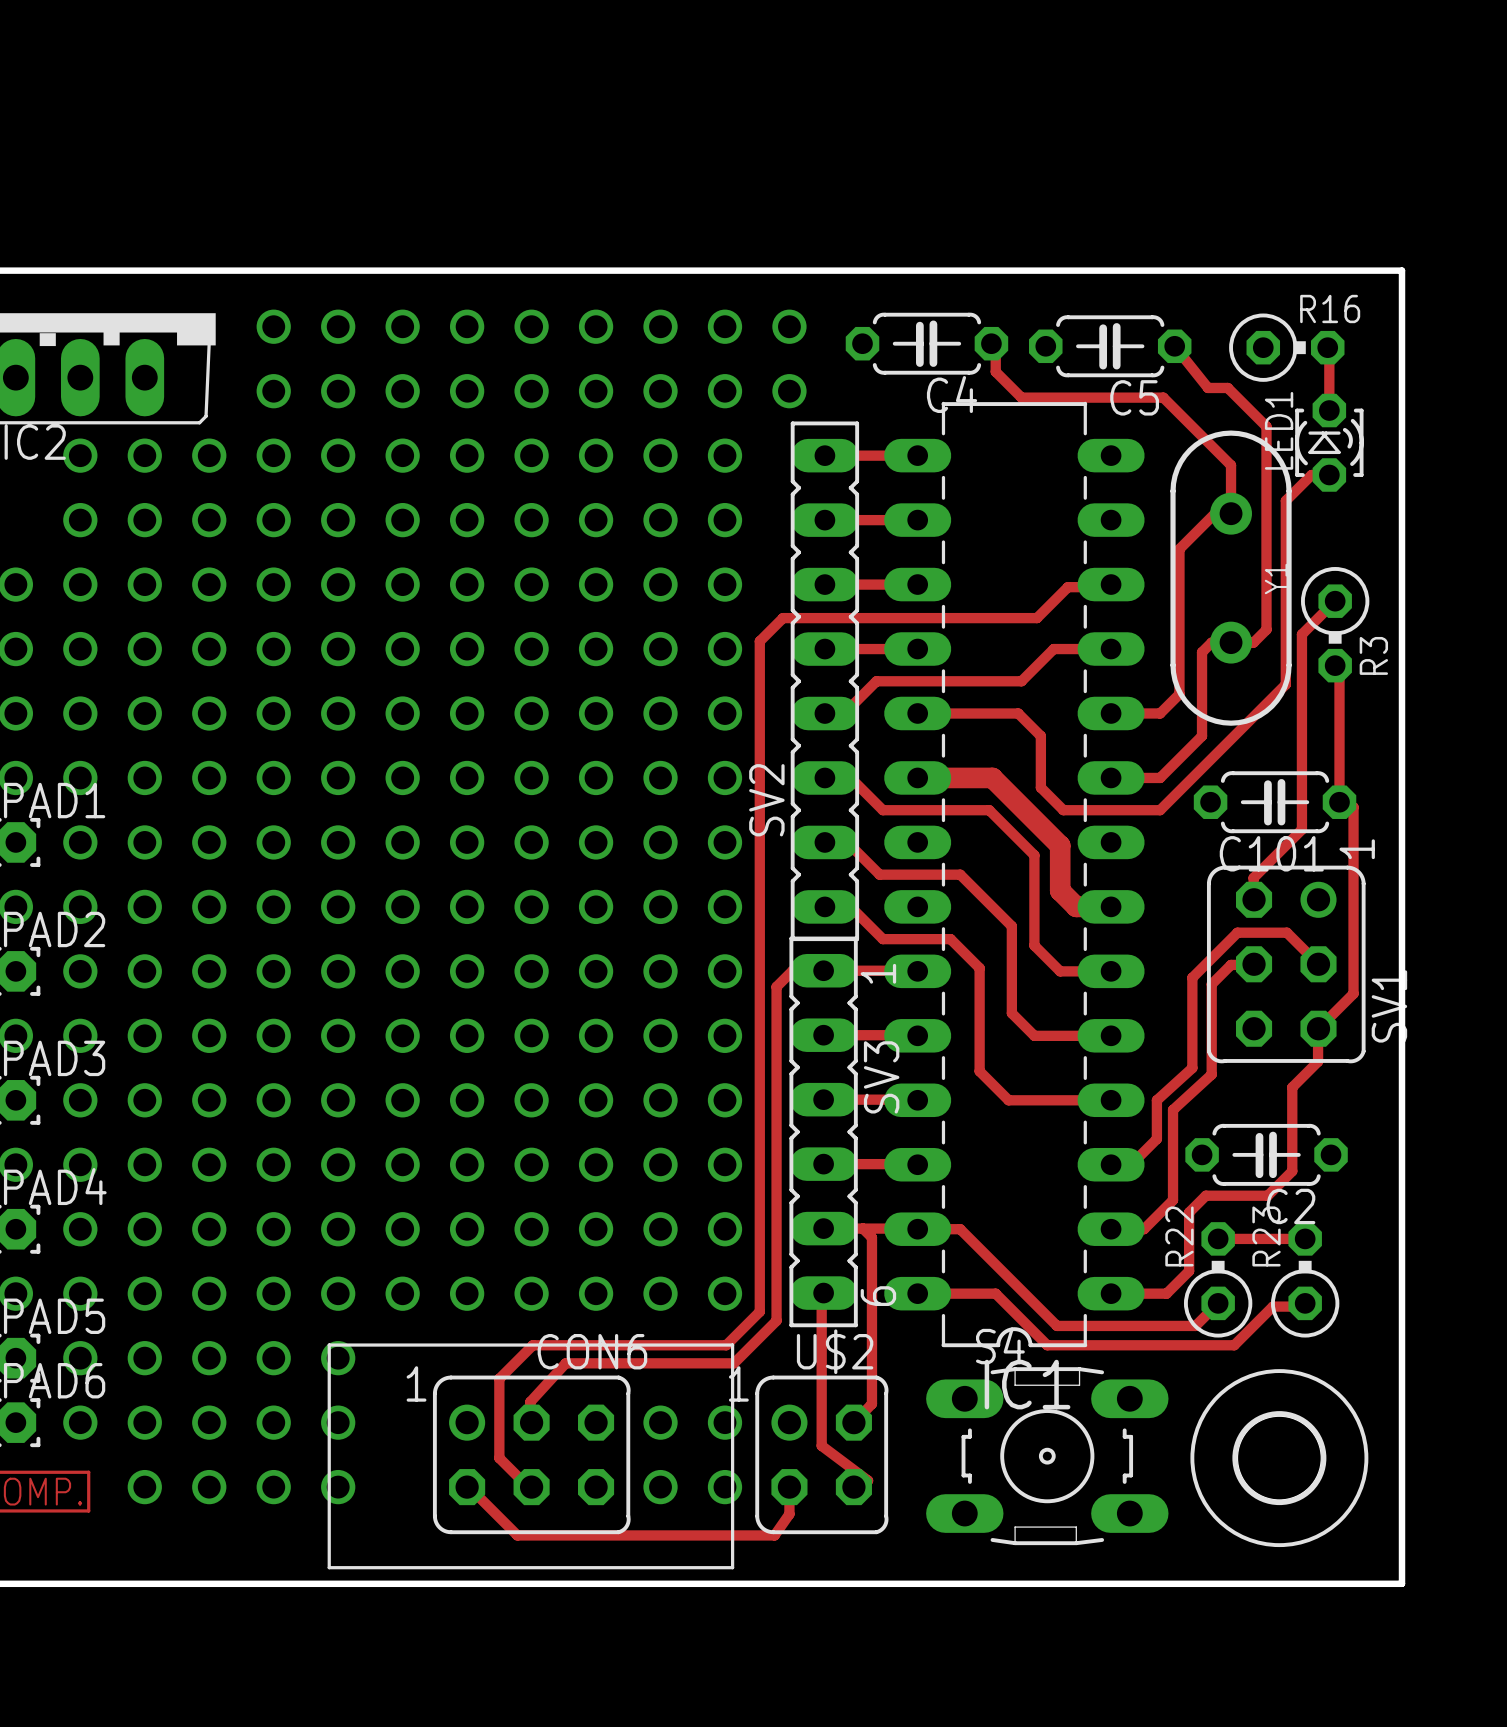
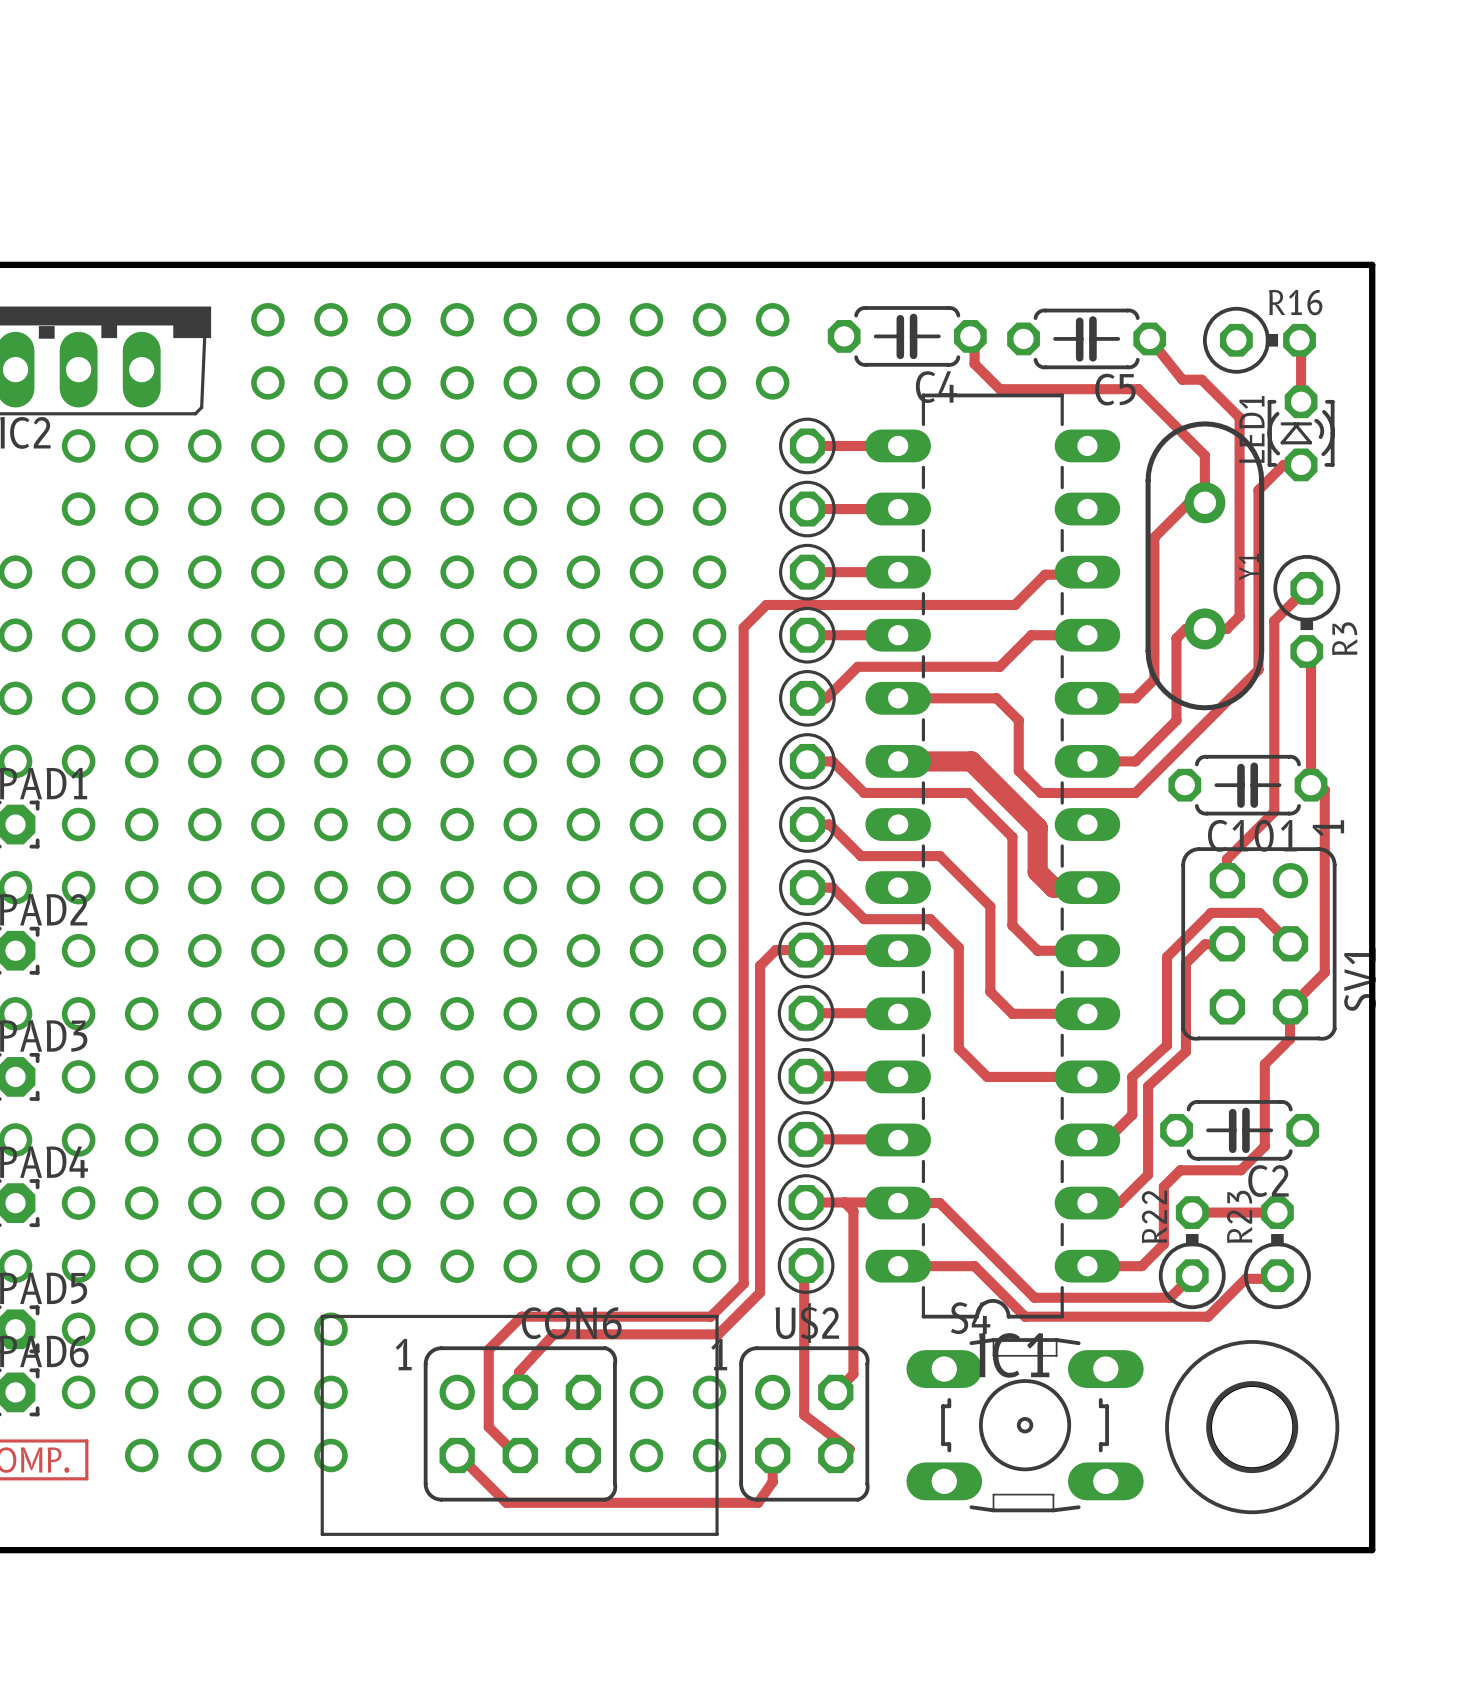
SV2: (824, 681) -> none
part: none -> (807, 666)
SV3: (823, 1131) -> none
part: none -> (806, 1107)

